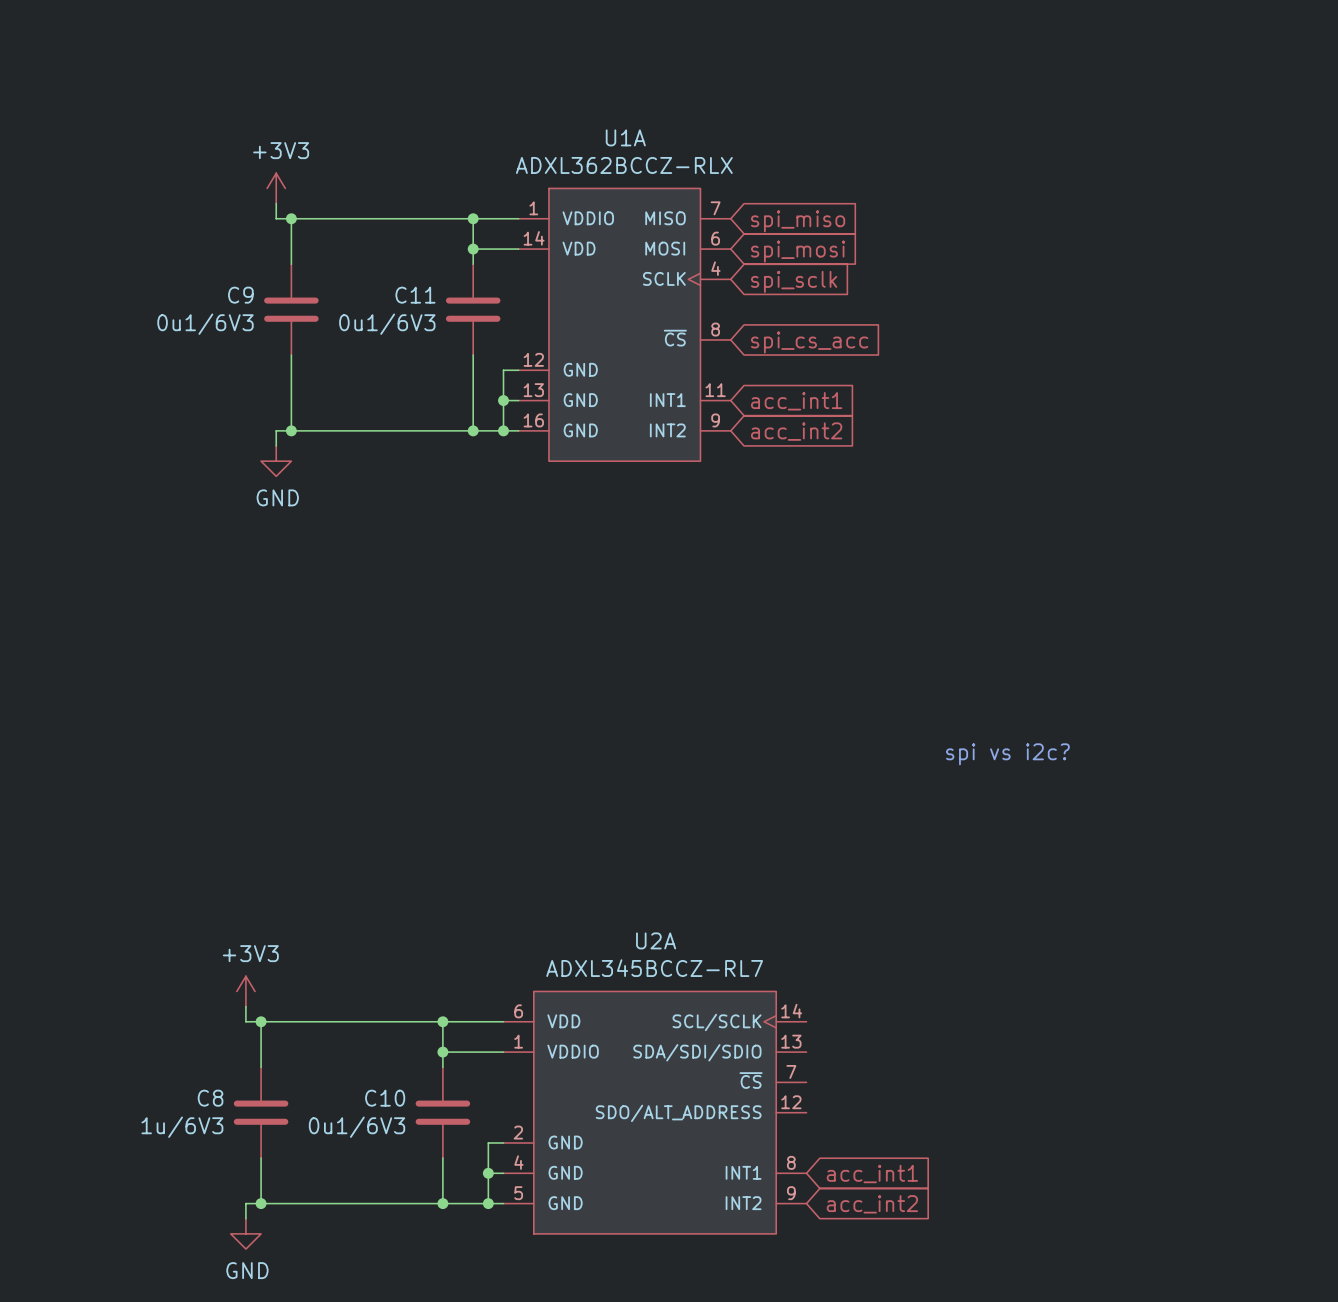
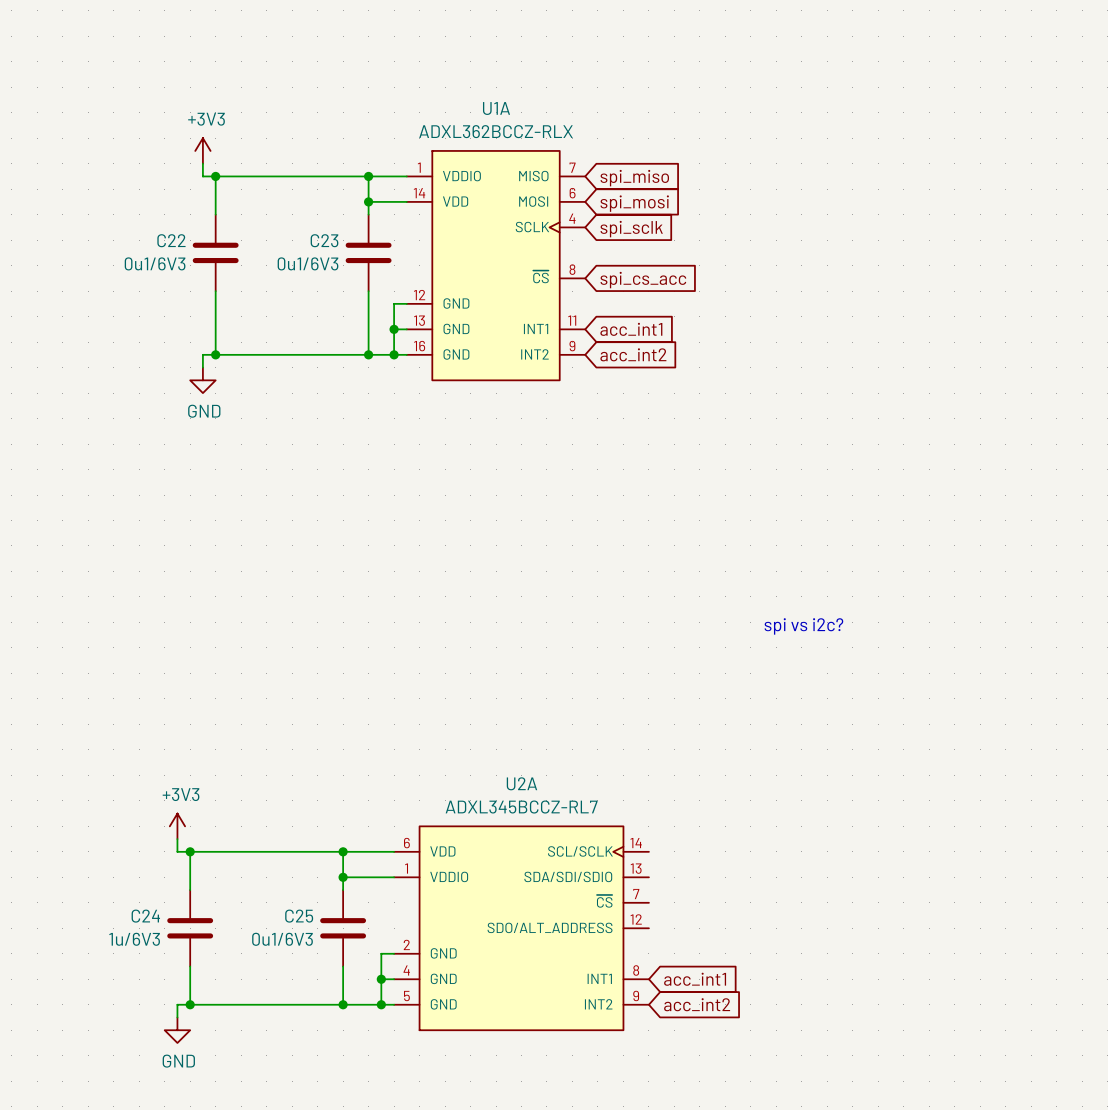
C9 name: C9 (240, 295) -> C22 (171, 240)
C11 name: C11 (415, 295) -> C23 (324, 240)
C8 name: C8 (210, 1098) -> C24 (145, 916)
C10 name: C10 (385, 1098) -> C25 (299, 916)

